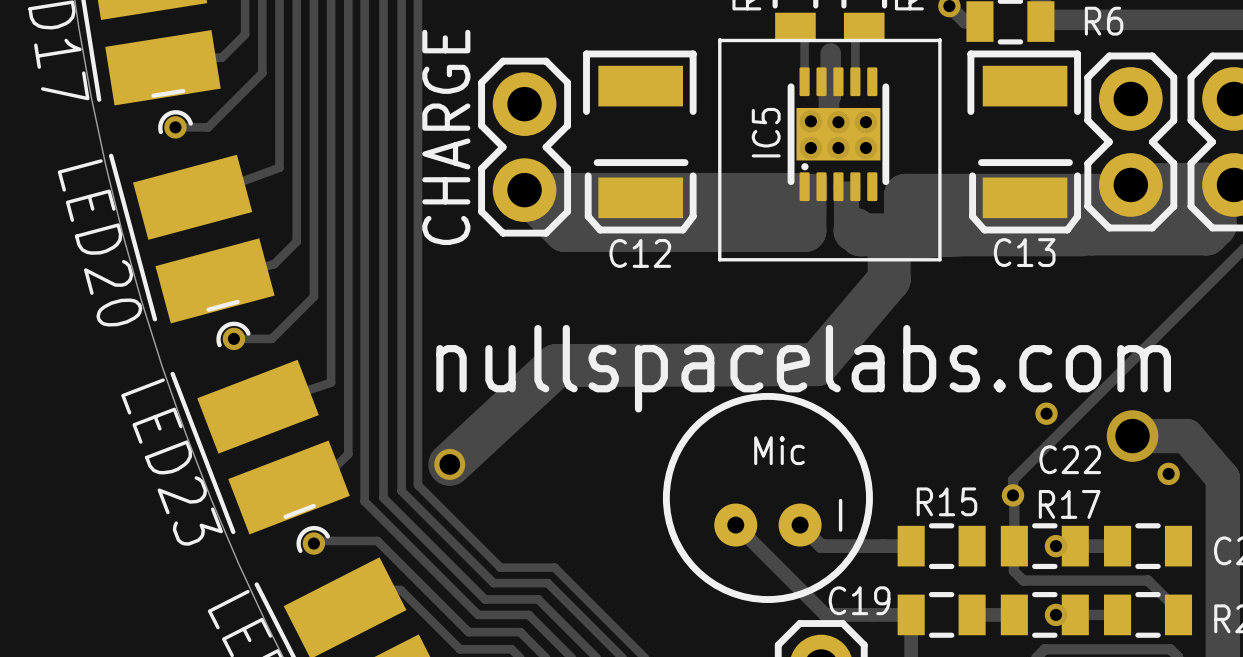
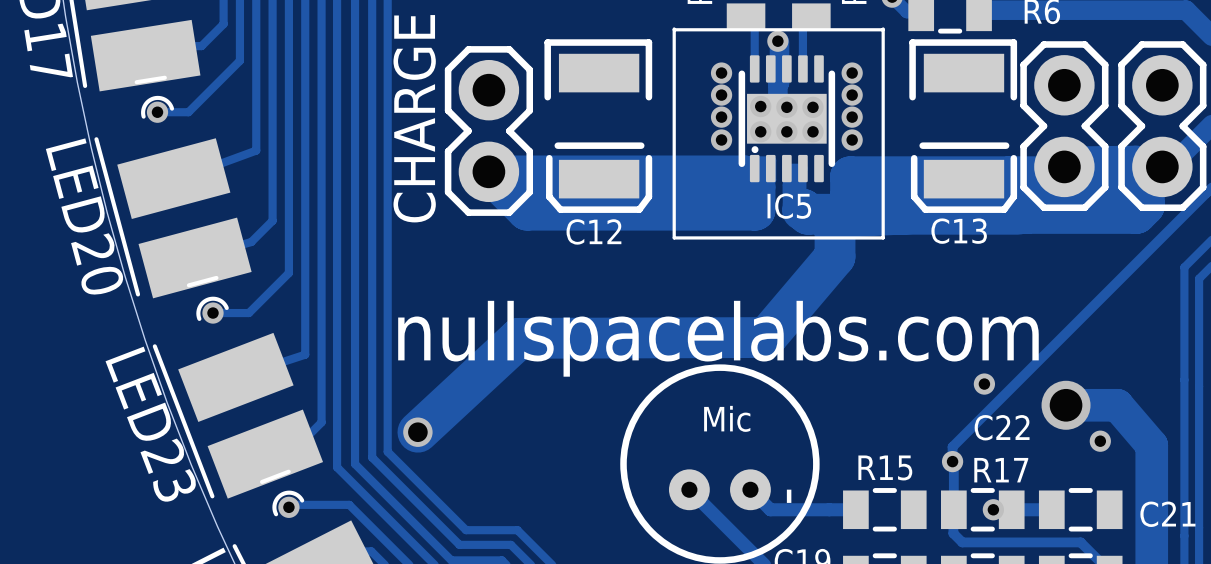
via: none -> (777, 41)
via: none -> (721, 73)
via: none -> (852, 73)
via: none -> (721, 95)
via: none -> (852, 95)
IC5 name rotation: 0° (766, 132) -> 90° clockwise (789, 206)
IC5 name position: IC5 (766, 132) -> IC5 (789, 206)
via: none -> (721, 117)
via: none -> (852, 117)
via: none -> (721, 139)
via: none -> (852, 139)

